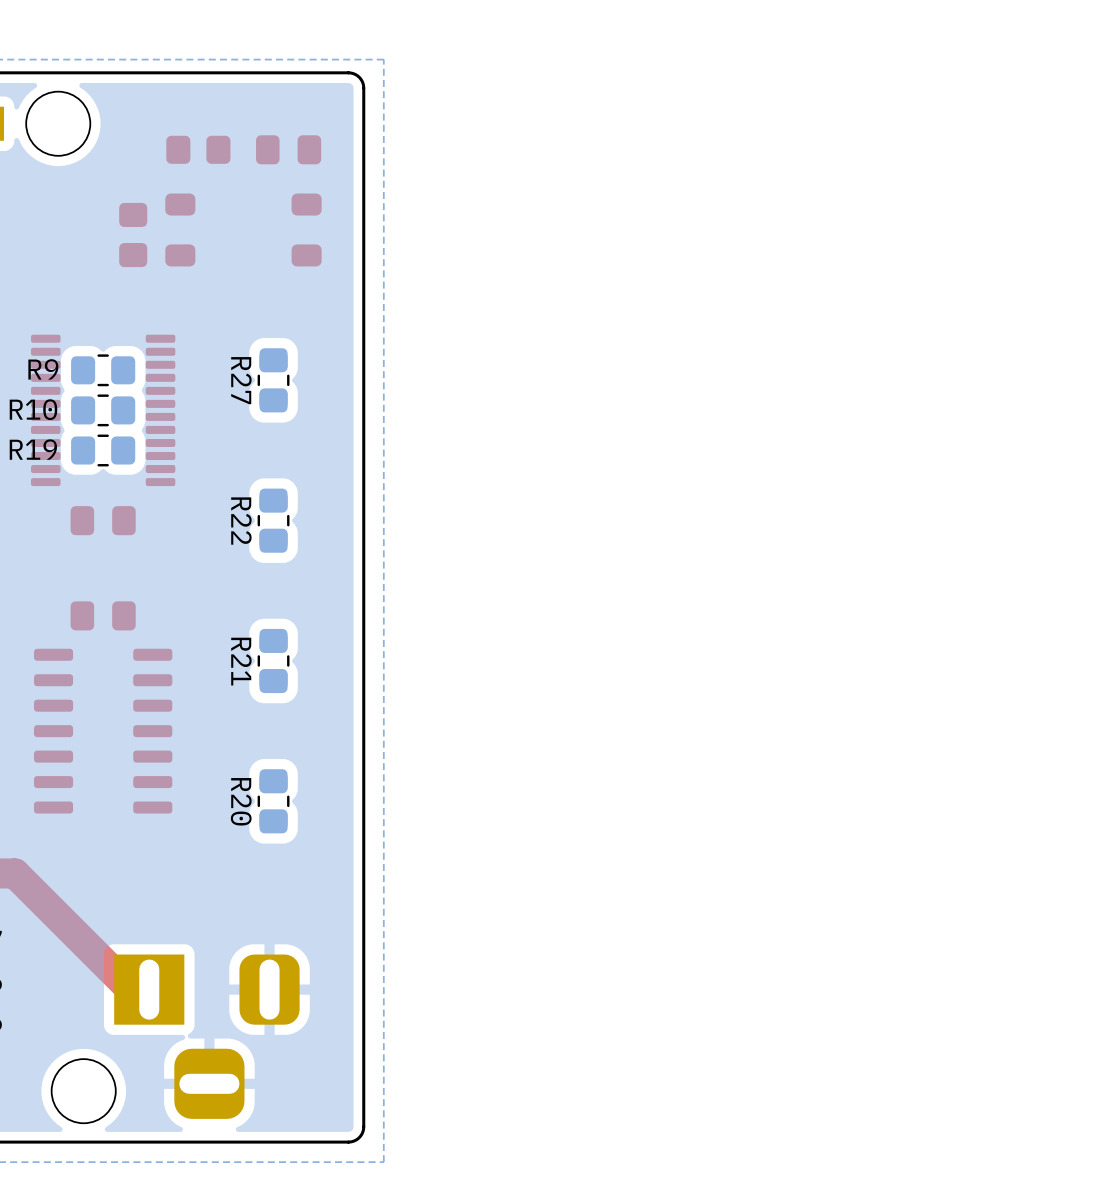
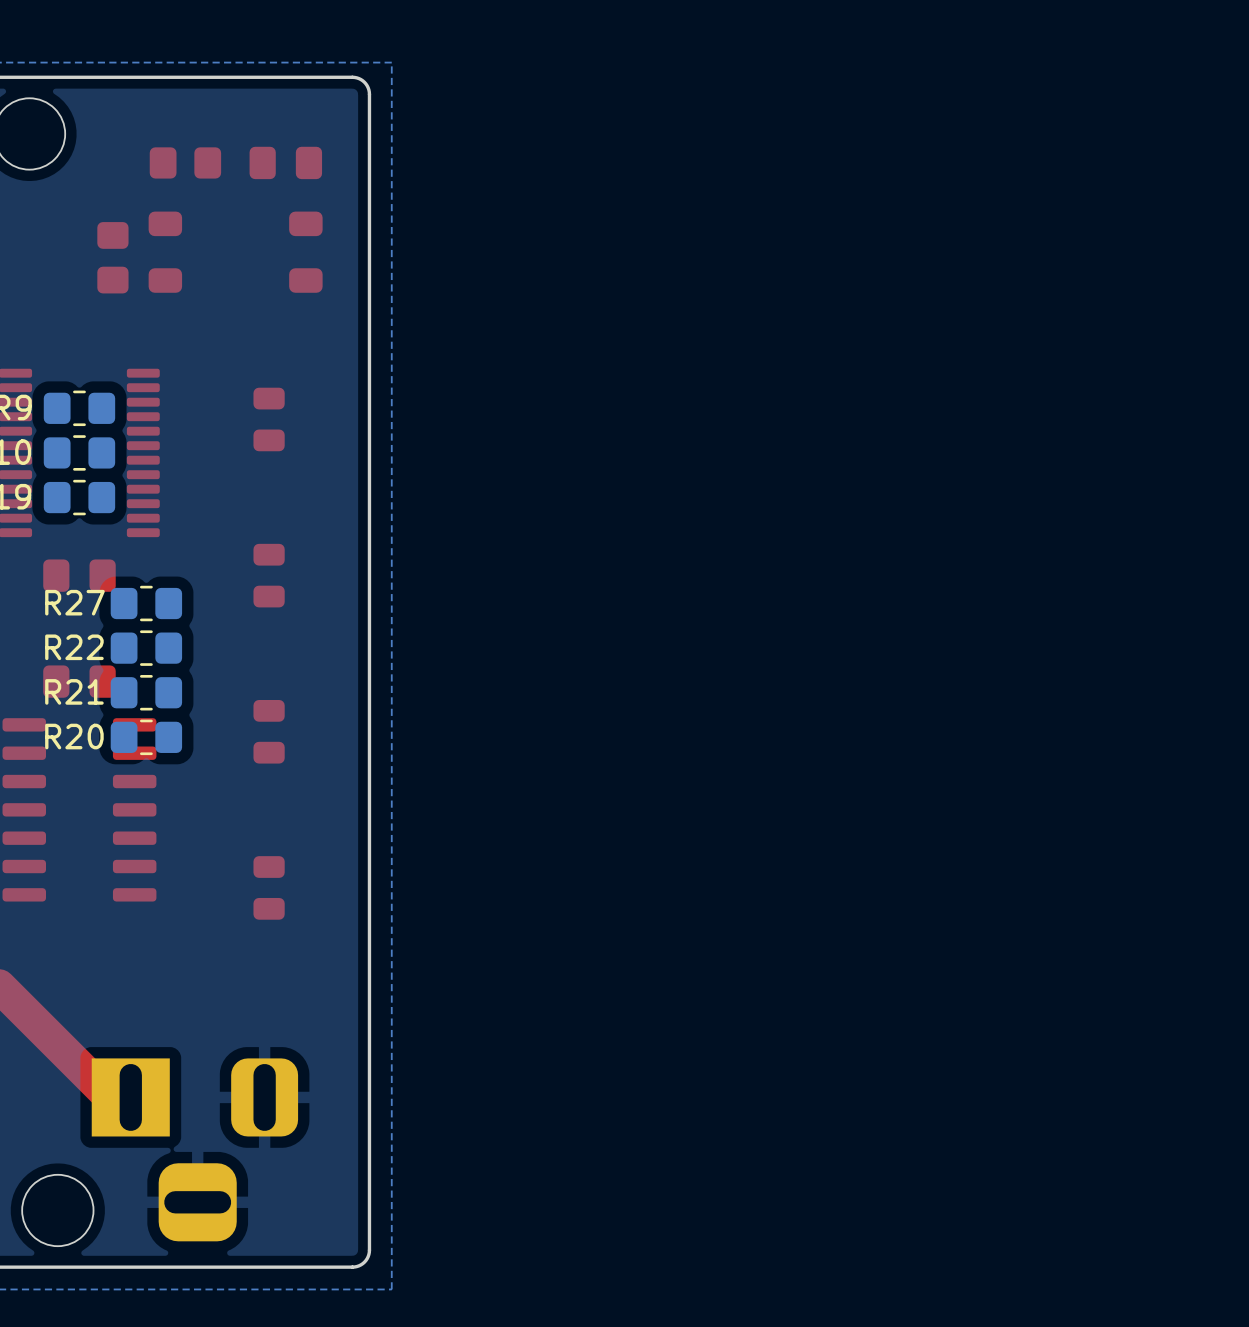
R27 rotation: 0° (273, 380) -> 90° clockwise (146, 603)
R27 position: (273, 380) -> (146, 603)
R22 rotation: 0° (273, 520) -> 90° clockwise (146, 648)
R22 position: (273, 520) -> (146, 648)
R21 rotation: 0° (273, 660) -> 90° clockwise (146, 692)
R21 position: (273, 660) -> (146, 692)
R20 rotation: 0° (273, 801) -> 90° clockwise (146, 737)
R20 position: (273, 801) -> (146, 737)

